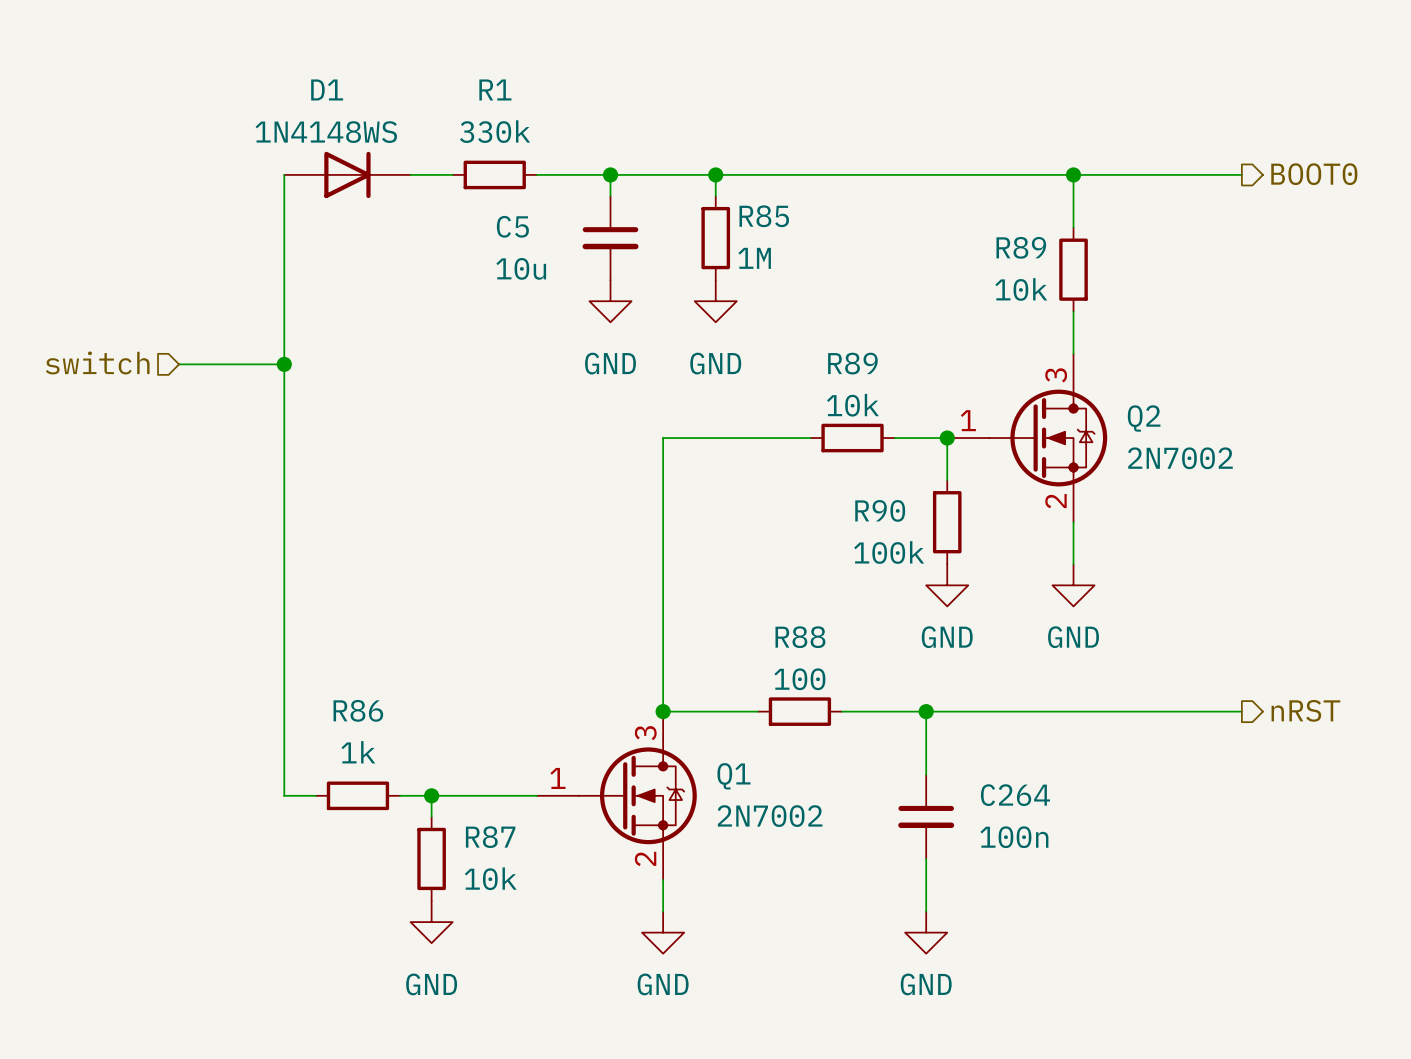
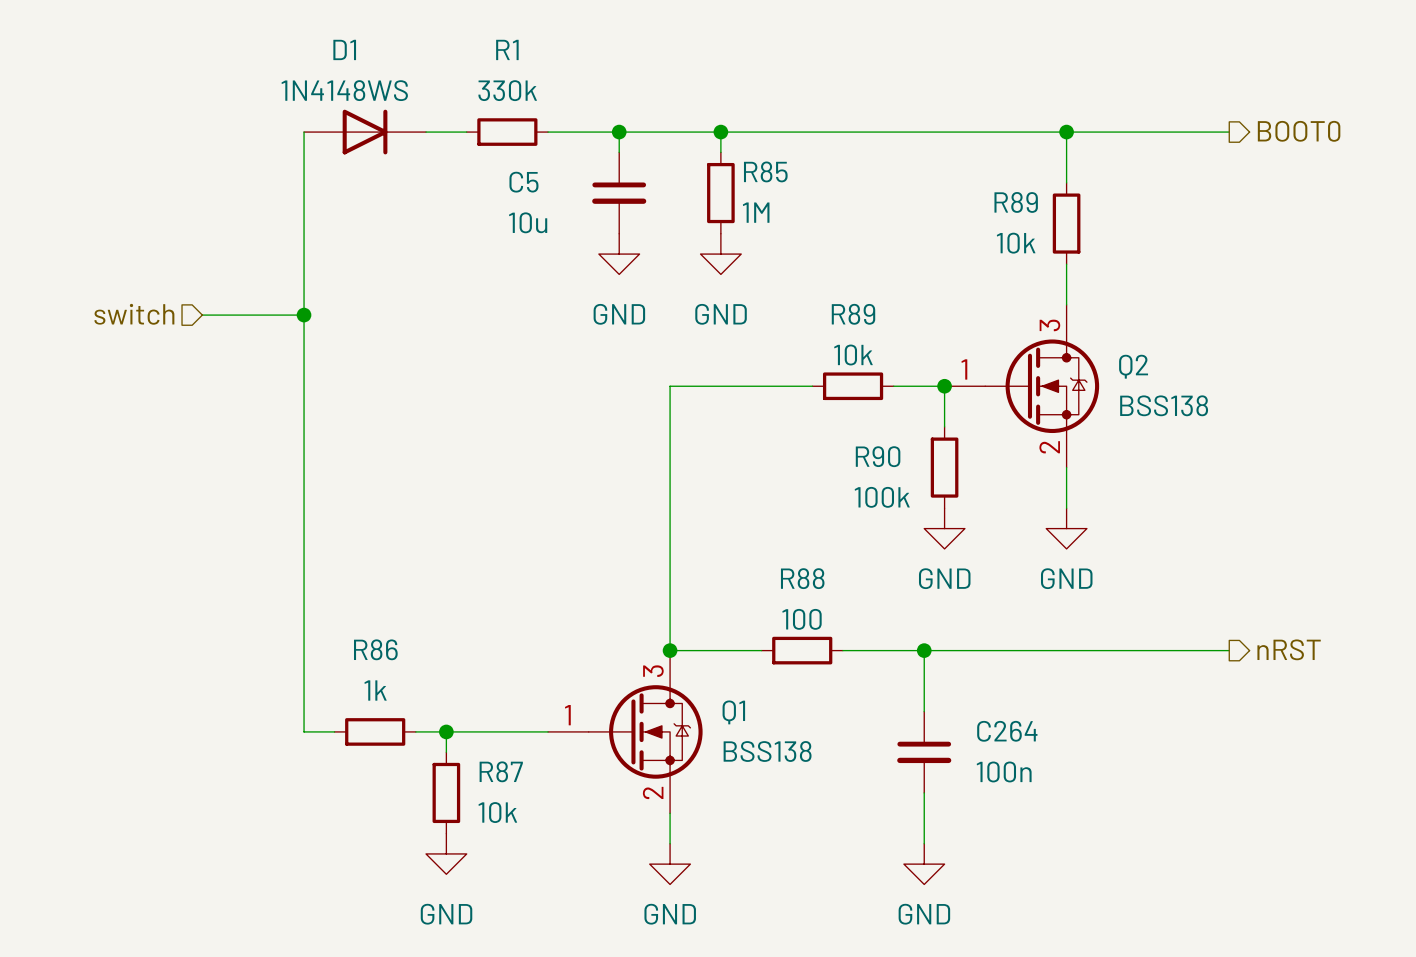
Q2 value: 2N7002 (1180, 458) -> BSS138 (1164, 405)
Q1 value: 2N7002 (770, 816) -> BSS138 (767, 751)

